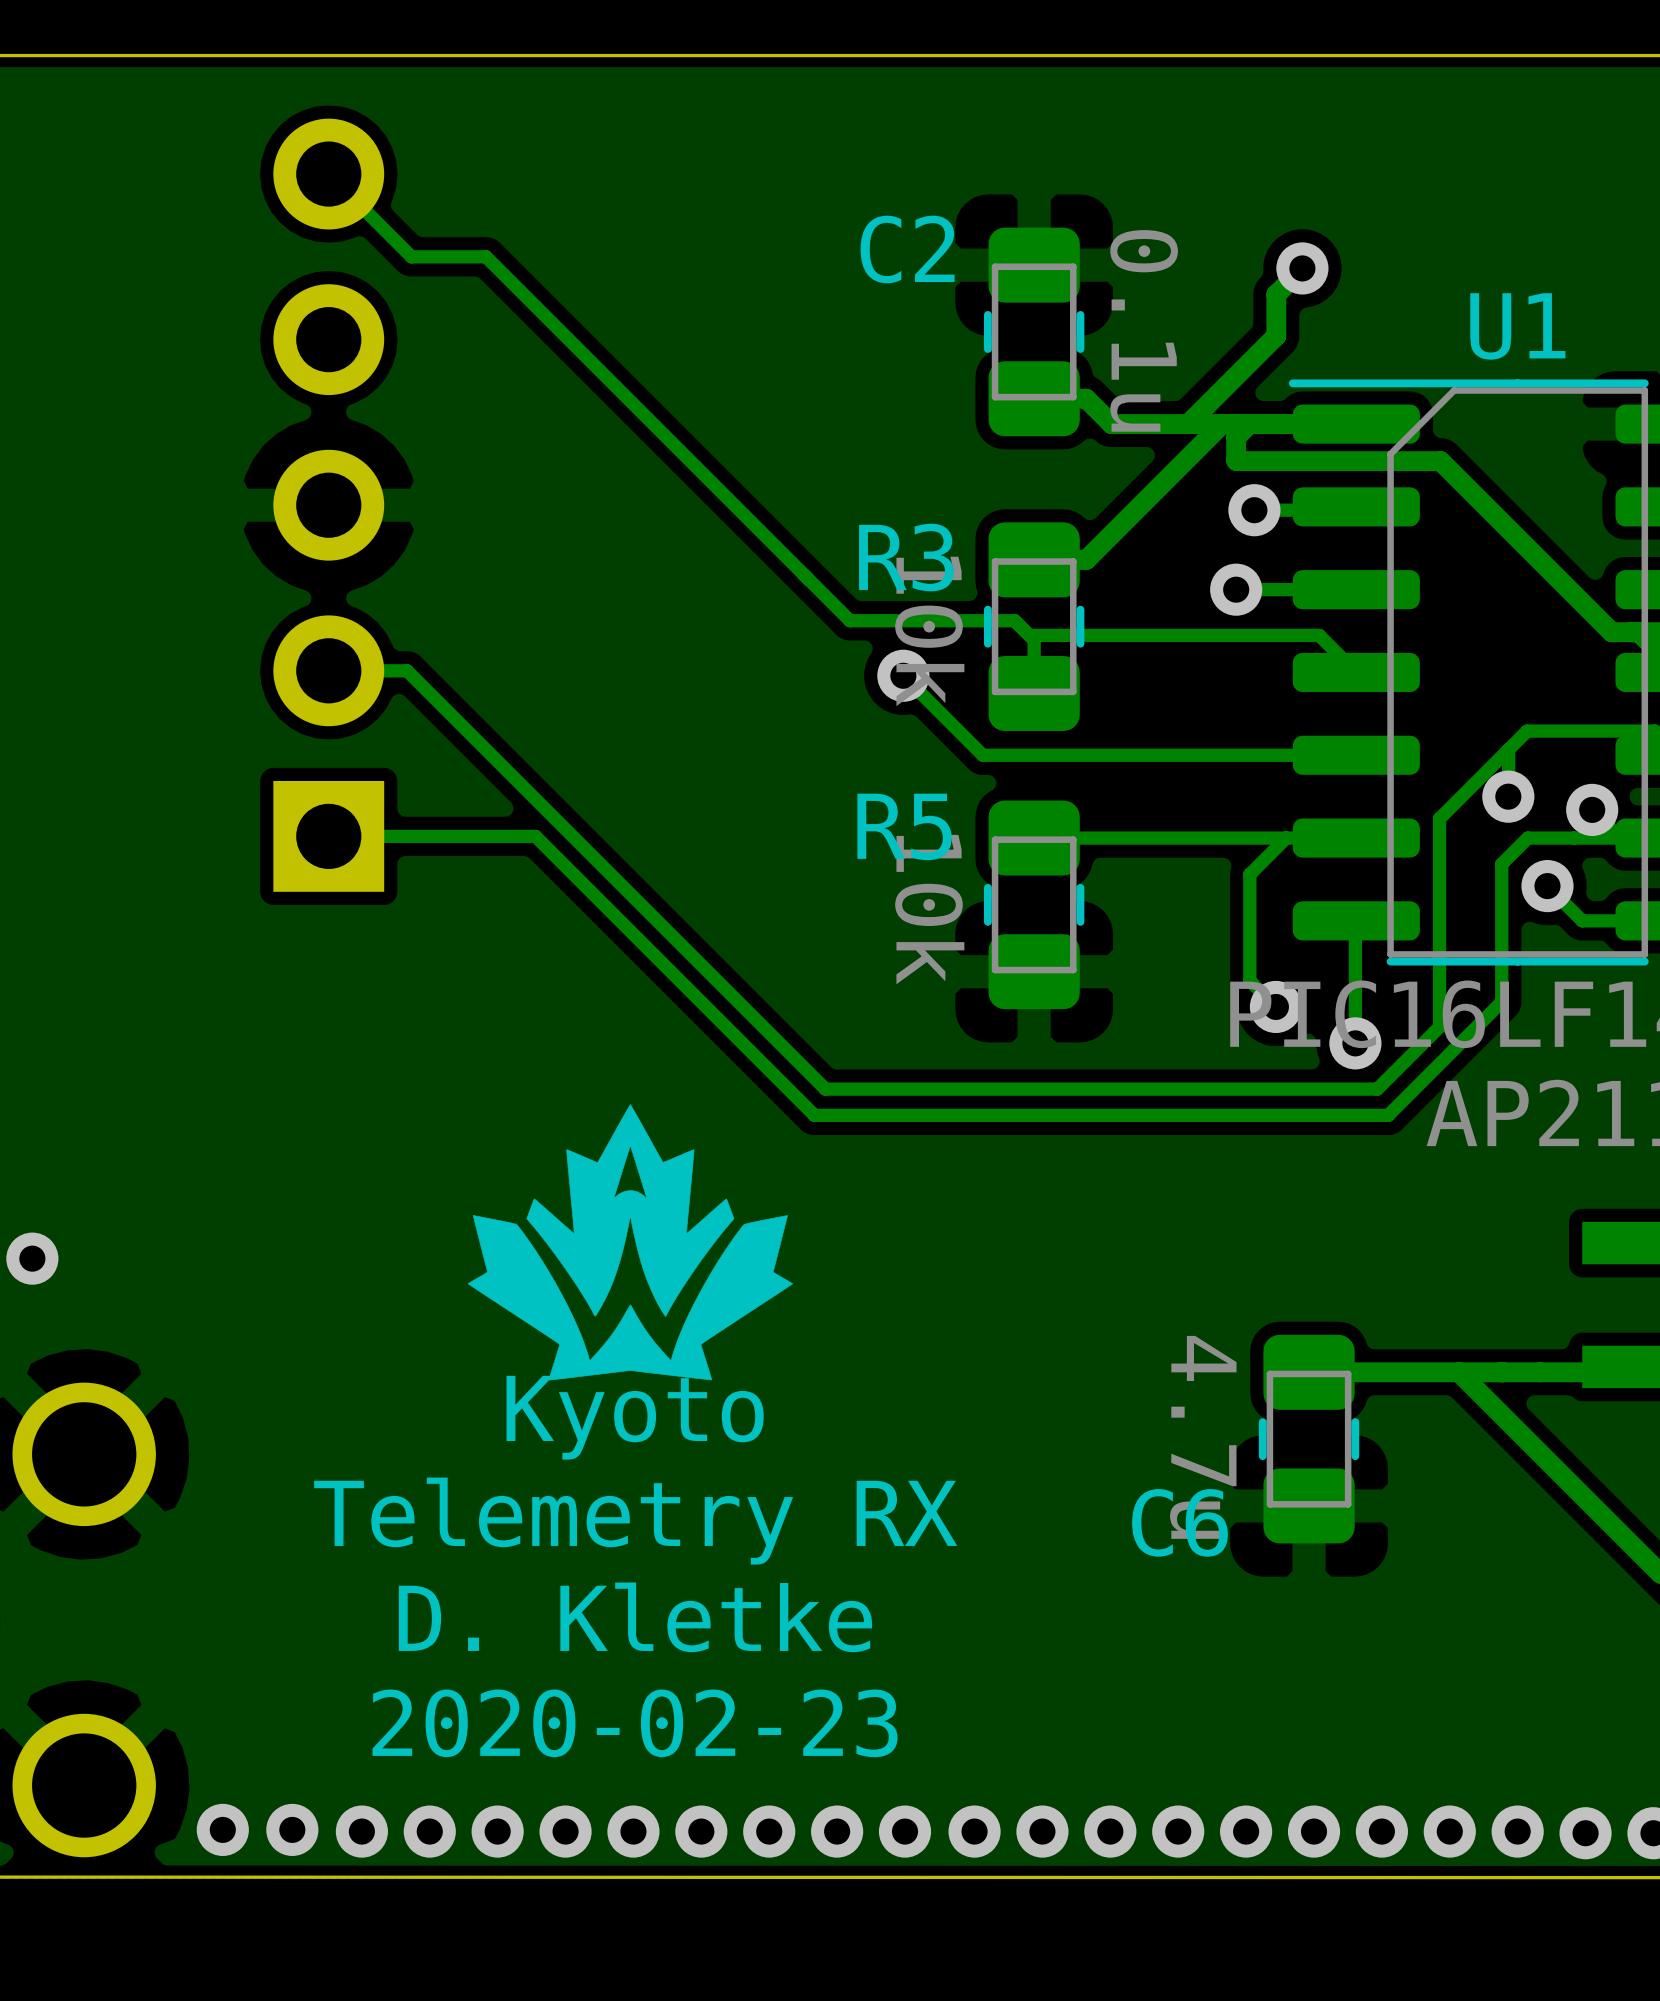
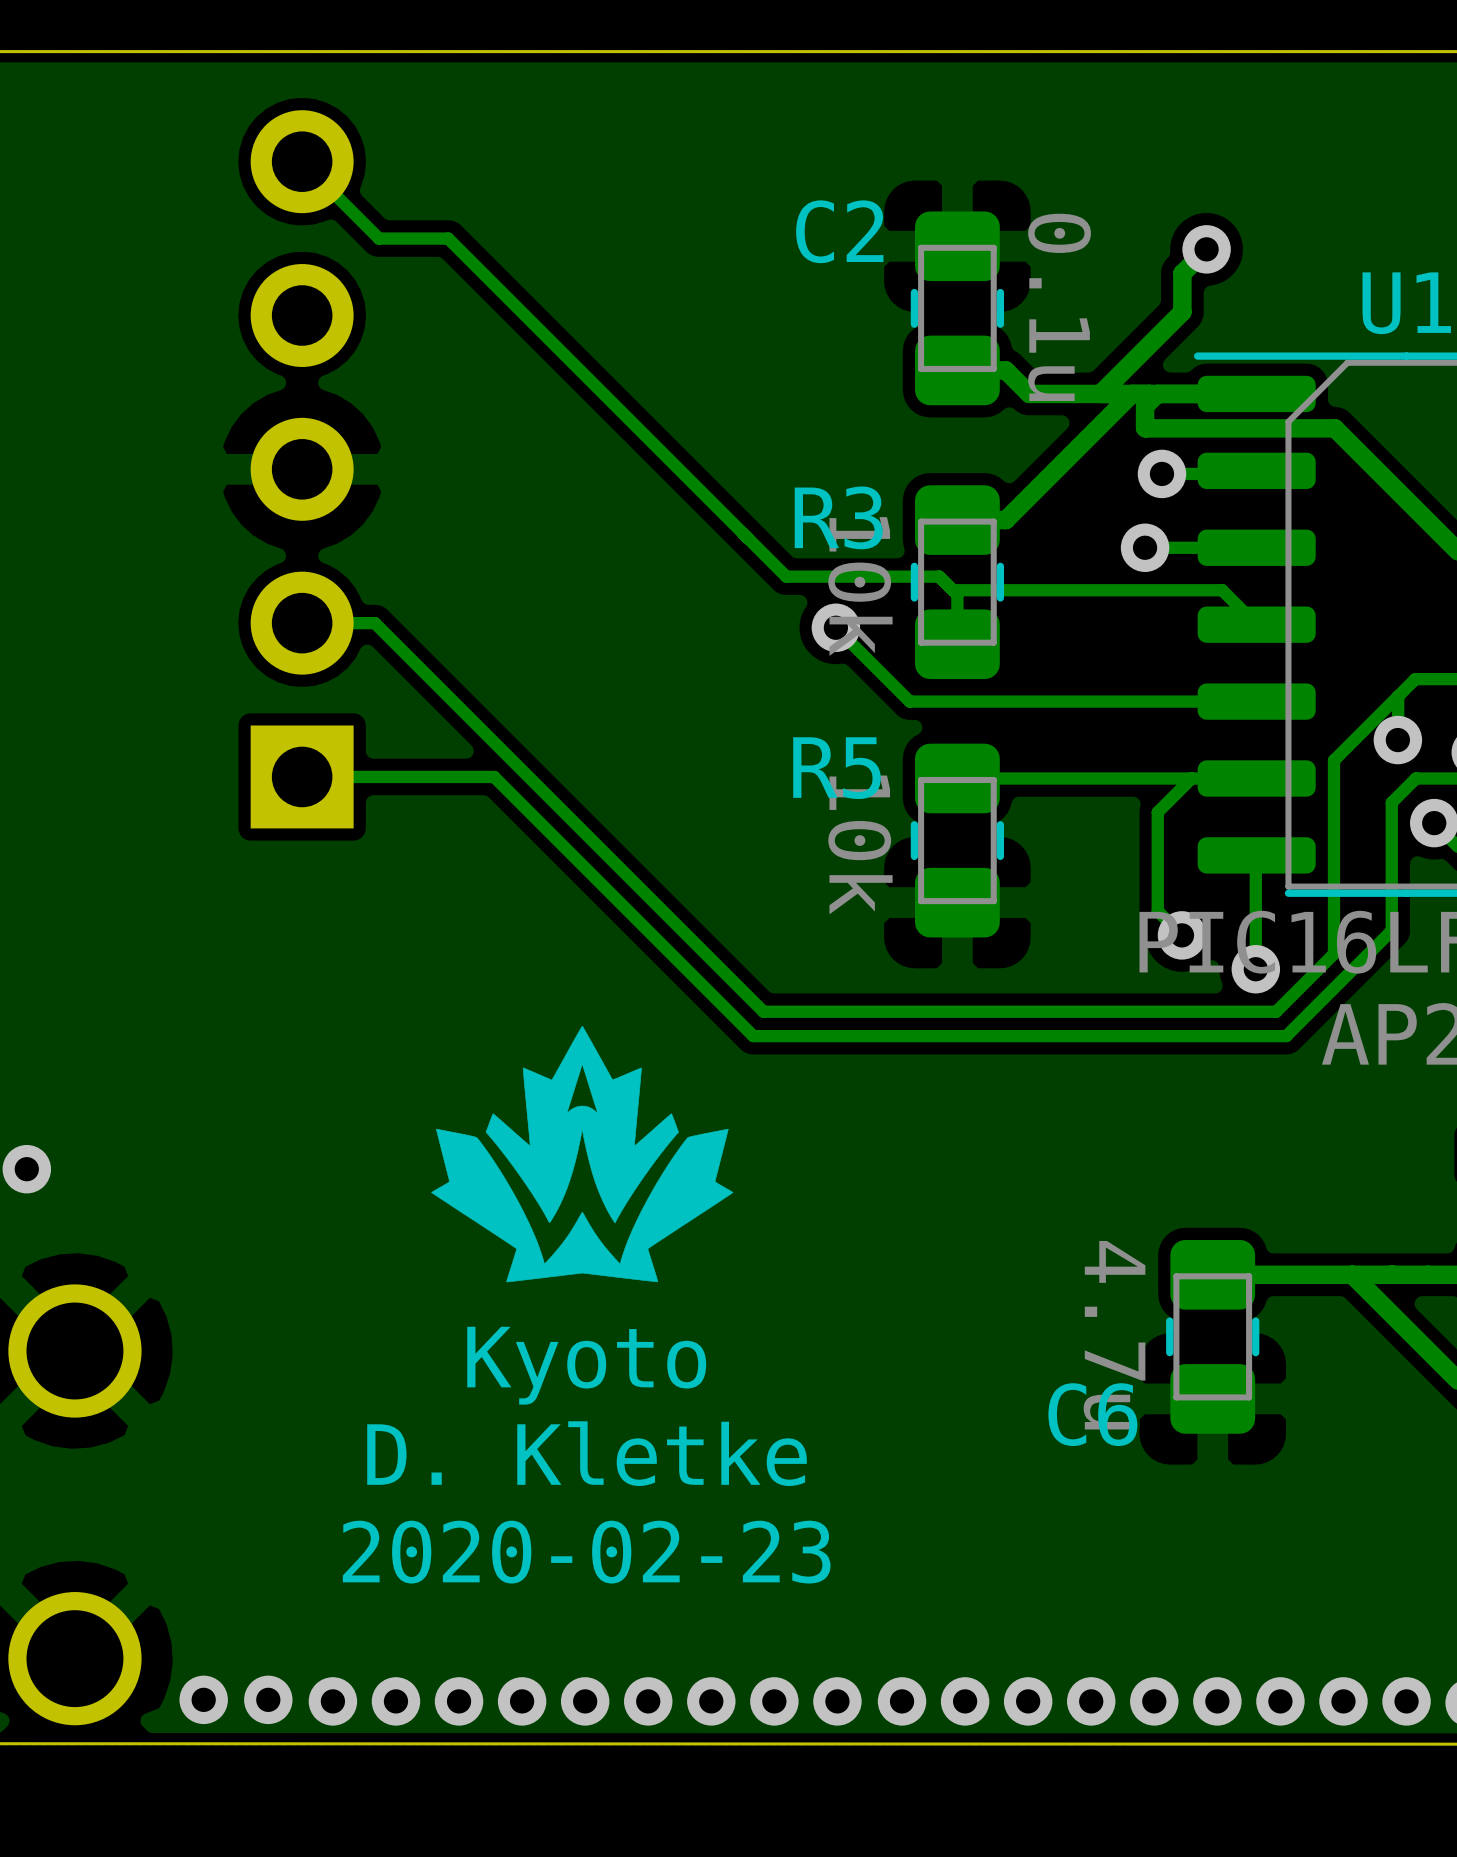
text position: Kyoto (635, 1417) -> Kyoto (586, 1365)
text: Telemetry RX (635, 1521) -> none
text position: D. Kletke (635, 1617) -> D. Kletke (587, 1453)
text position: 2020-02-23 (635, 1723) -> 2020-02-23 (586, 1552)

